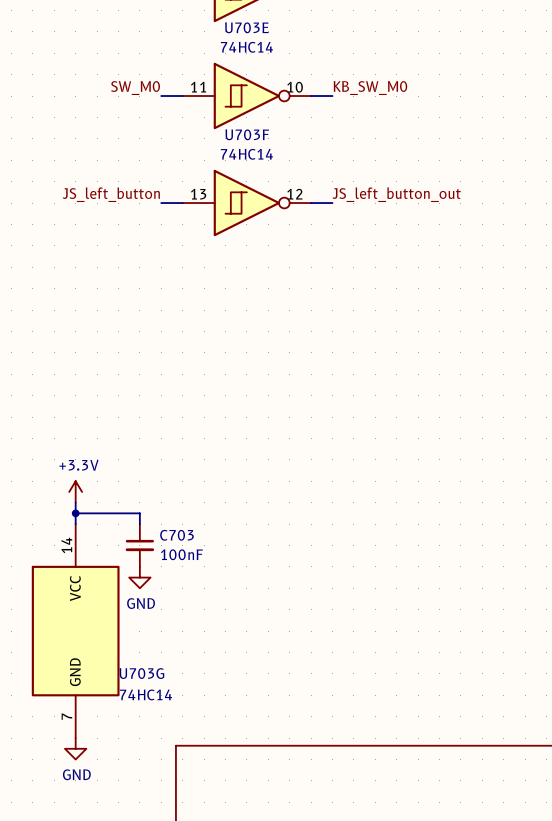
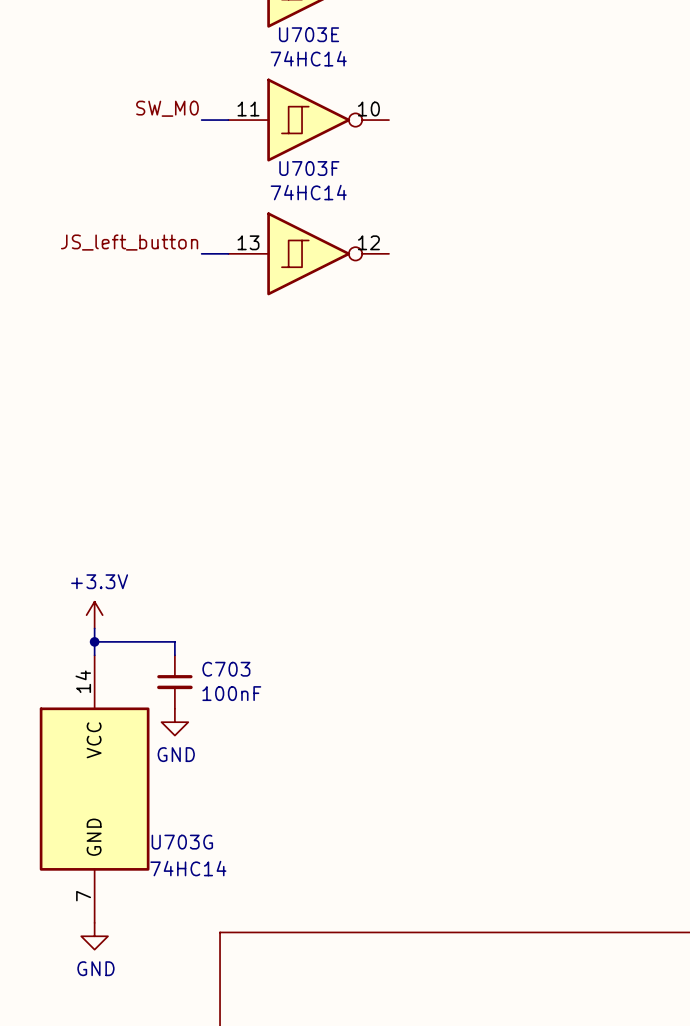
label: KB_SW_M0 (370, 88) -> none
wire: (311, 96) (332, 96) -> none
label: JS_left_button_out (396, 194) -> none
wire: (311, 203) (332, 203) -> none

